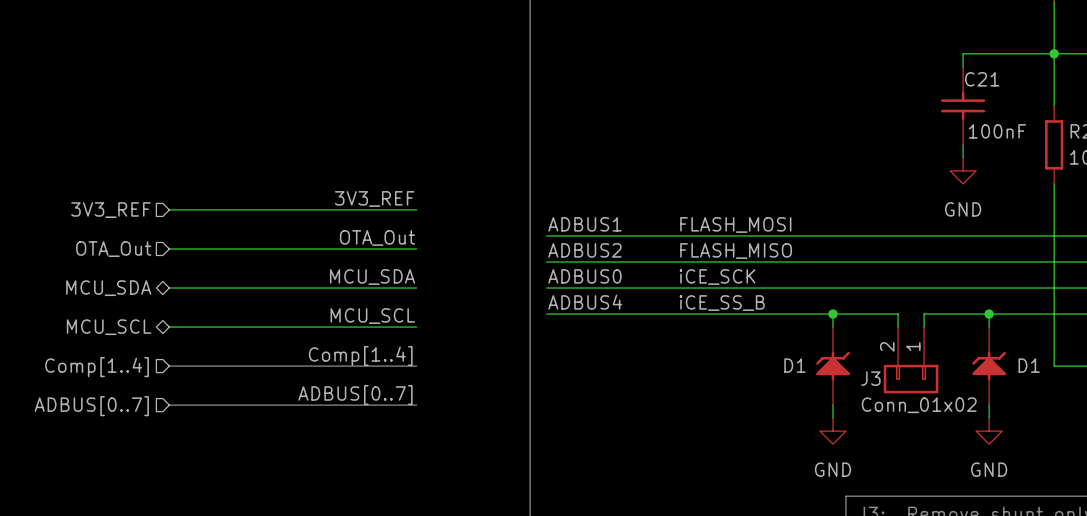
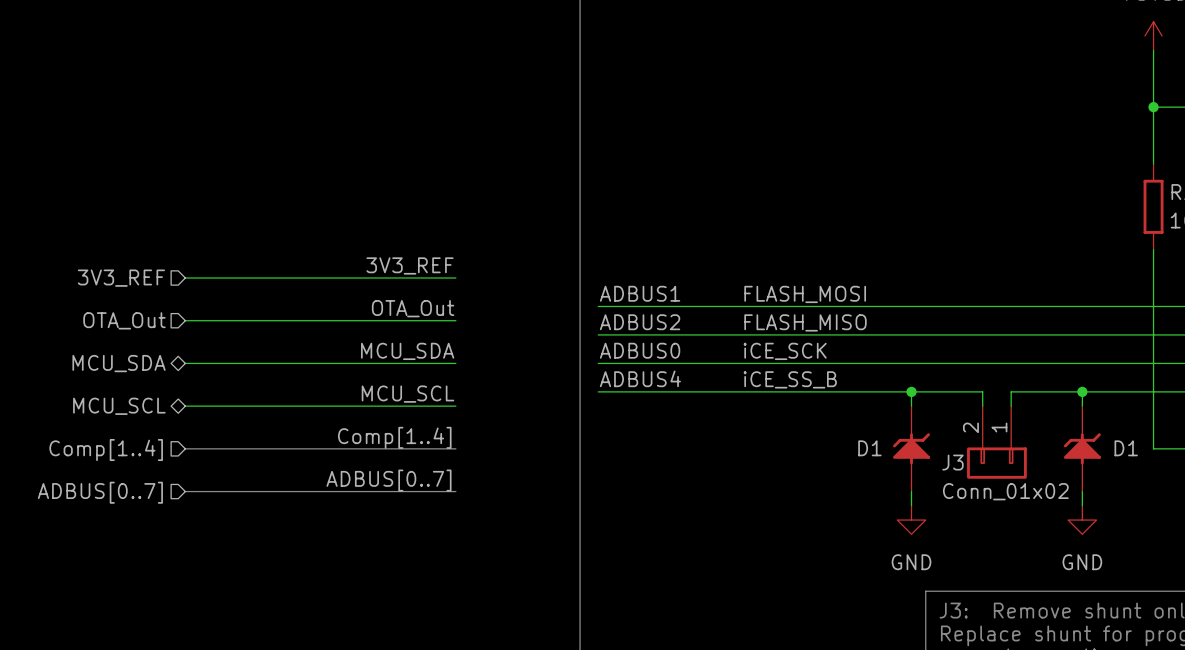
wire: (1054, 53) (963, 53) (963, 66) -> none
C21: (963, 105) -> none
wire: (963, 144) (963, 157) -> none
power symbol: GND (963, 170) -> none

